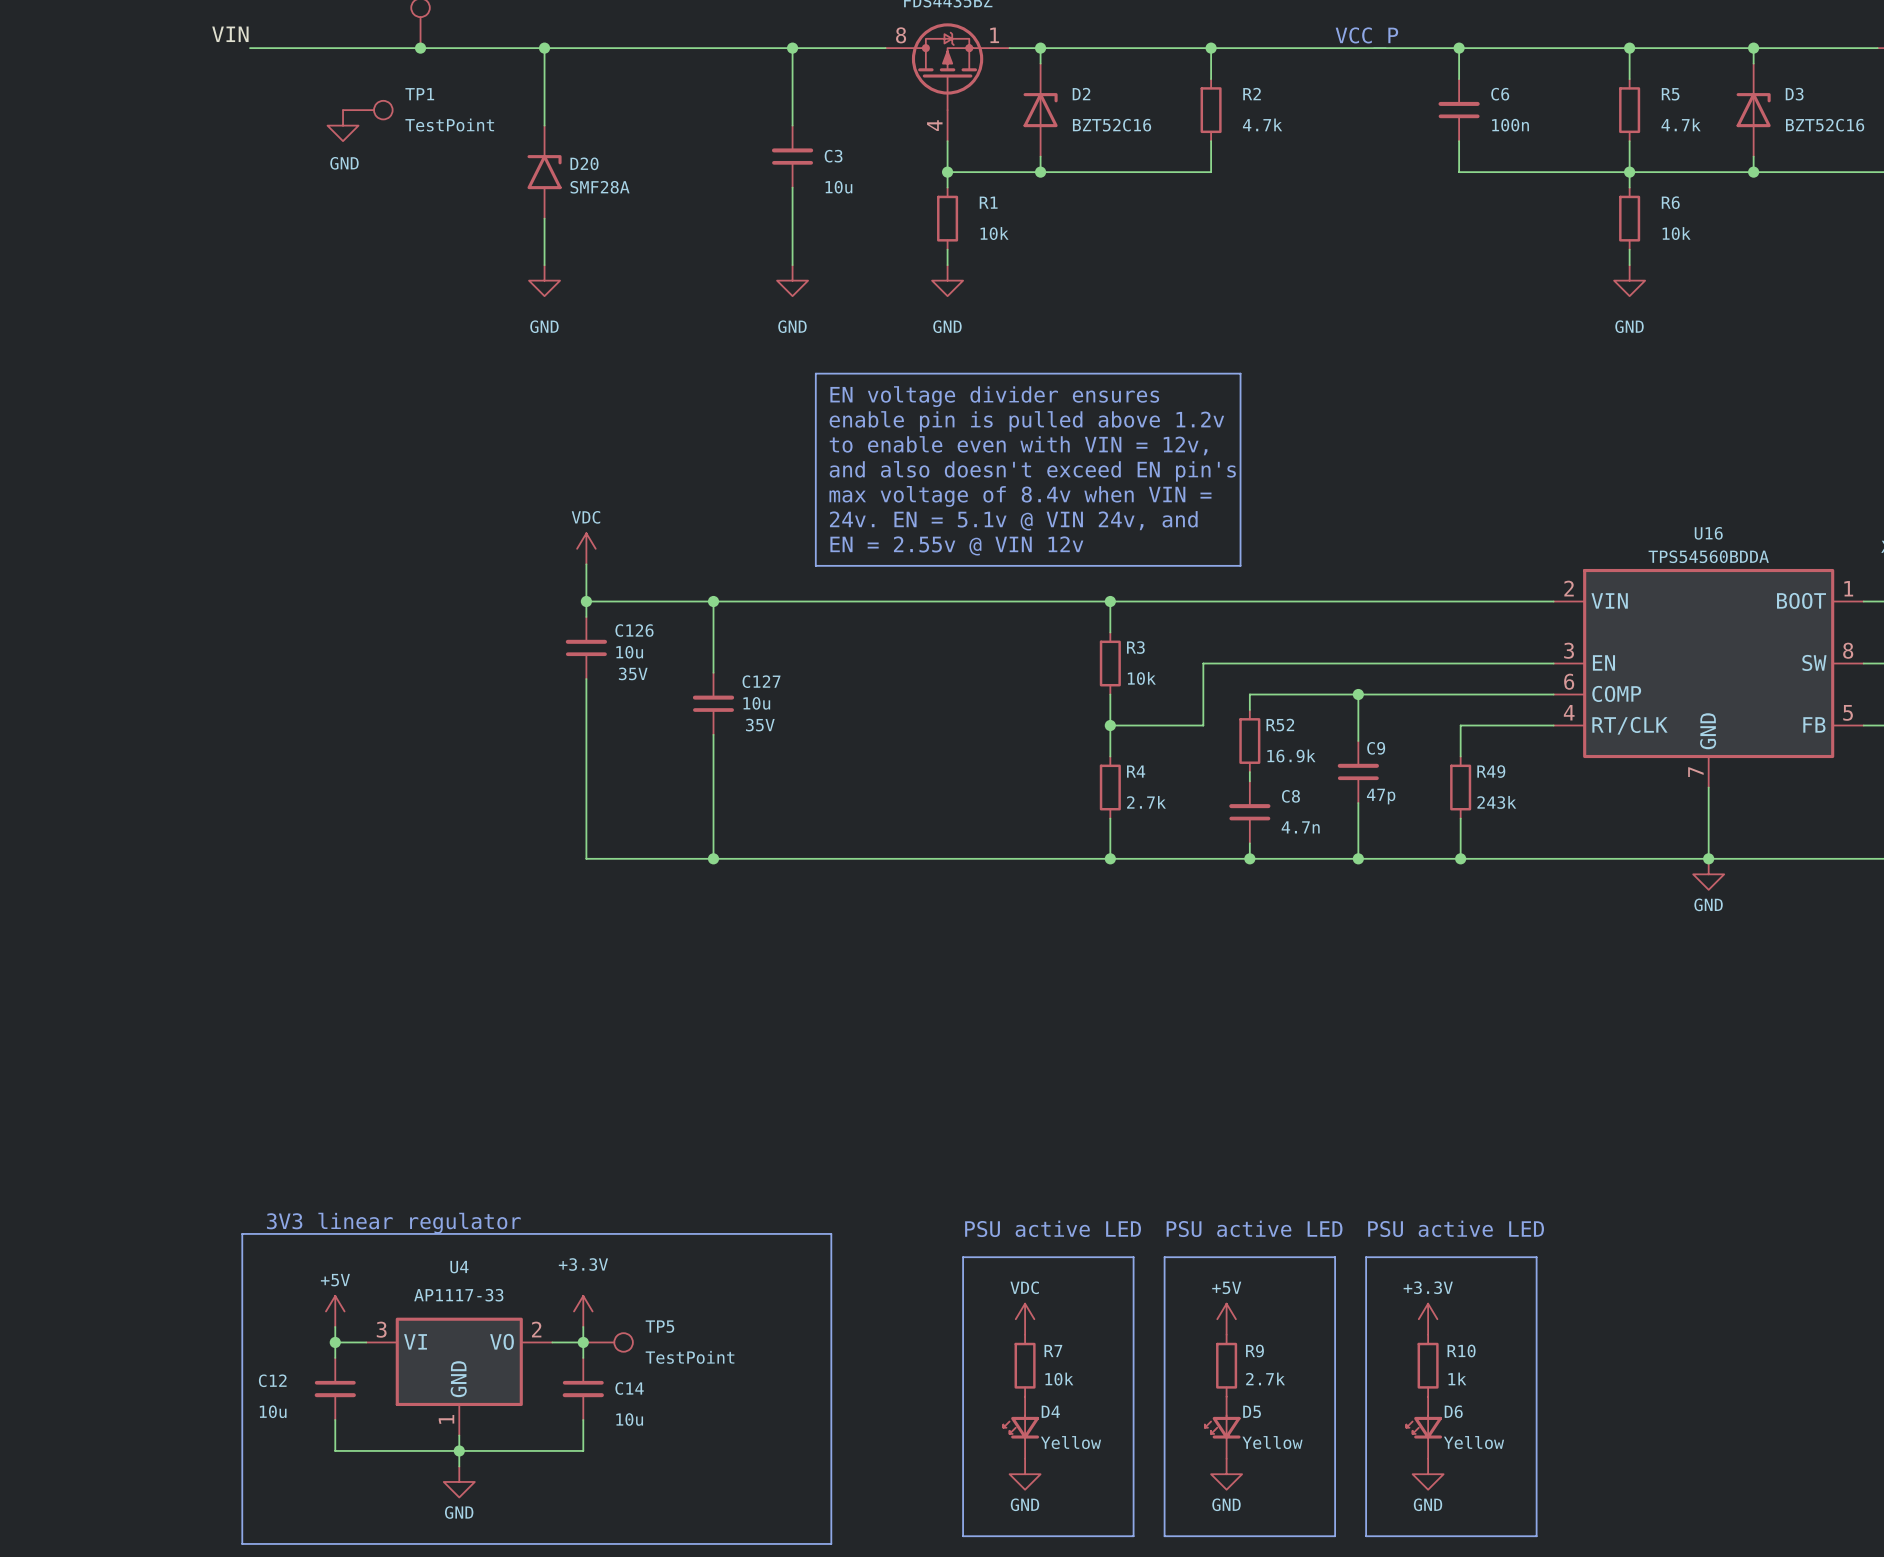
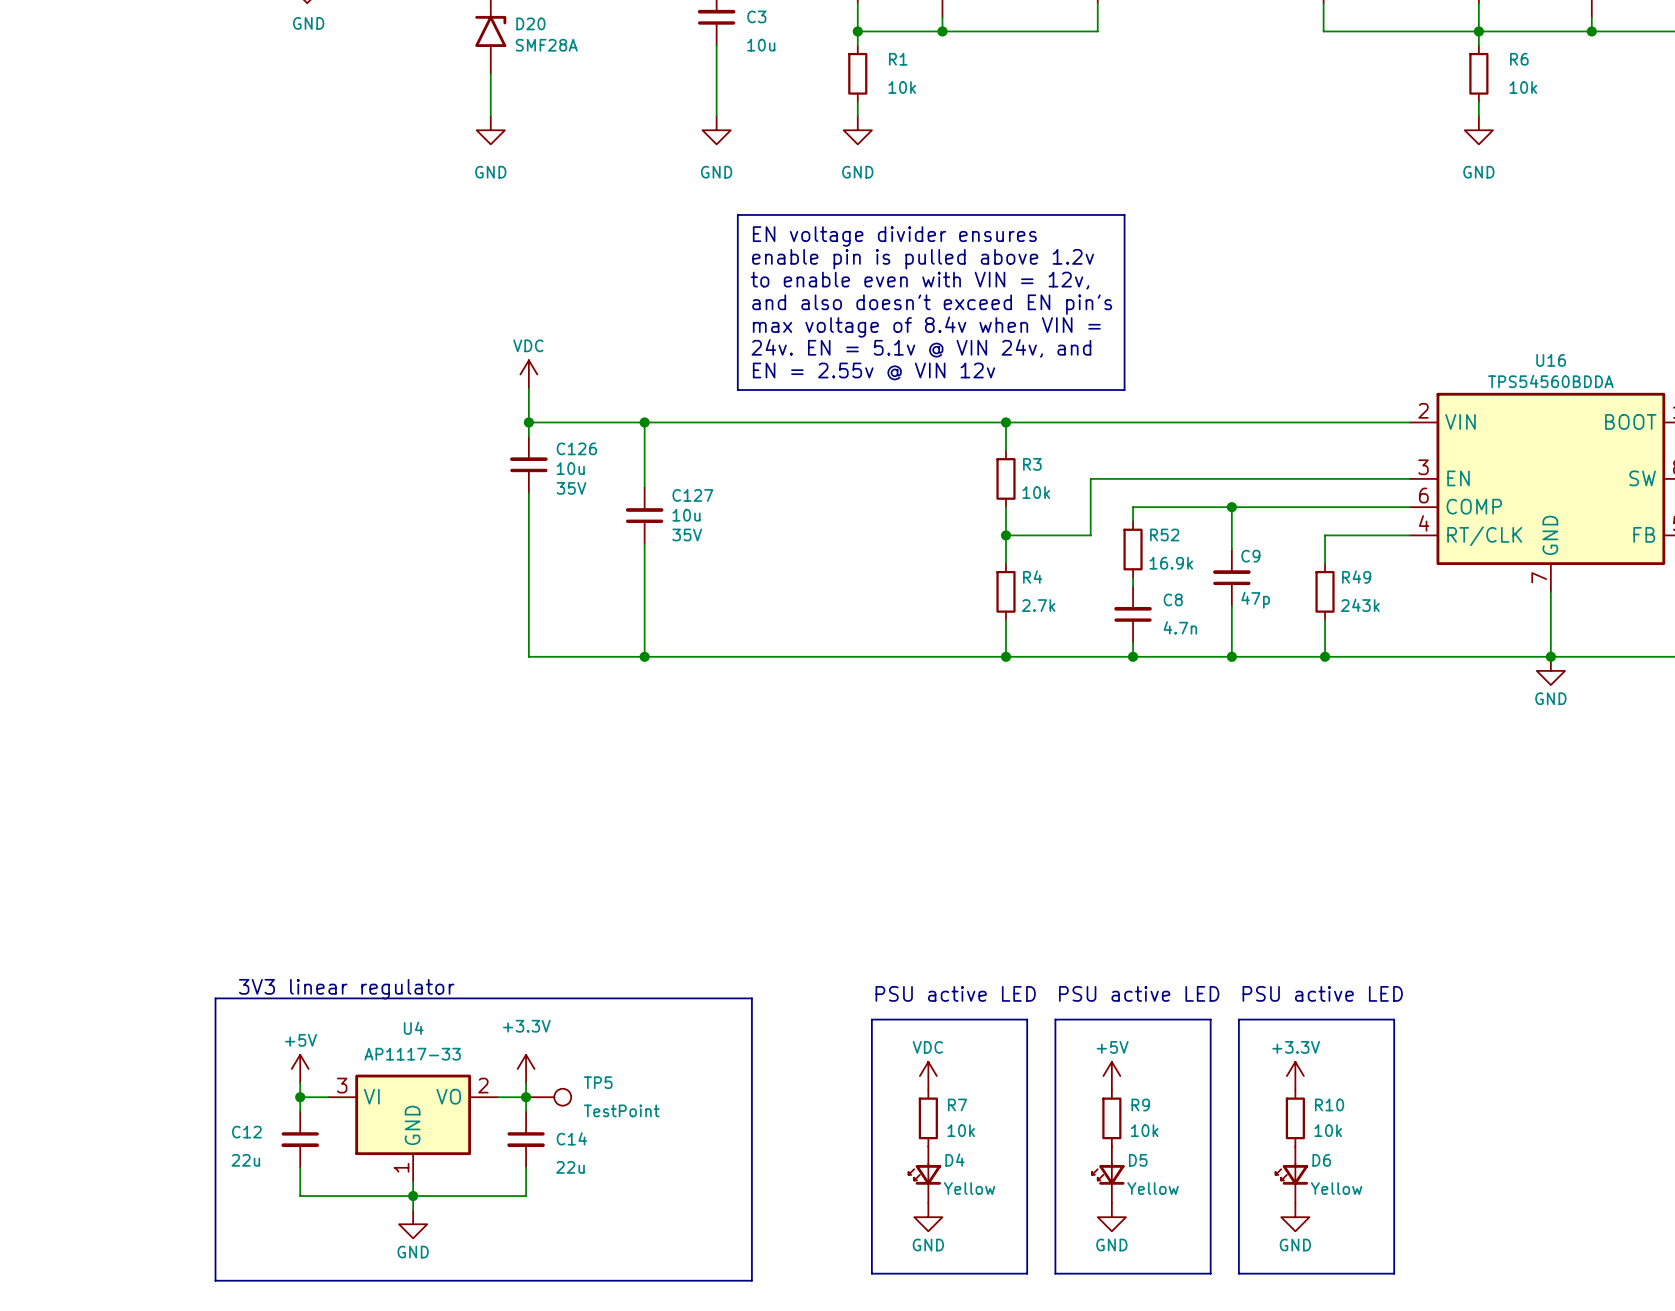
R9 value: 2.7k (1265, 1378) -> 10k (1144, 1130)
R10 value: 1k (1457, 1378) -> 10k (1328, 1130)
C12 value: 10u (273, 1411) -> 22u (245, 1160)
C14 value: 10u (629, 1419) -> 22u (570, 1167)

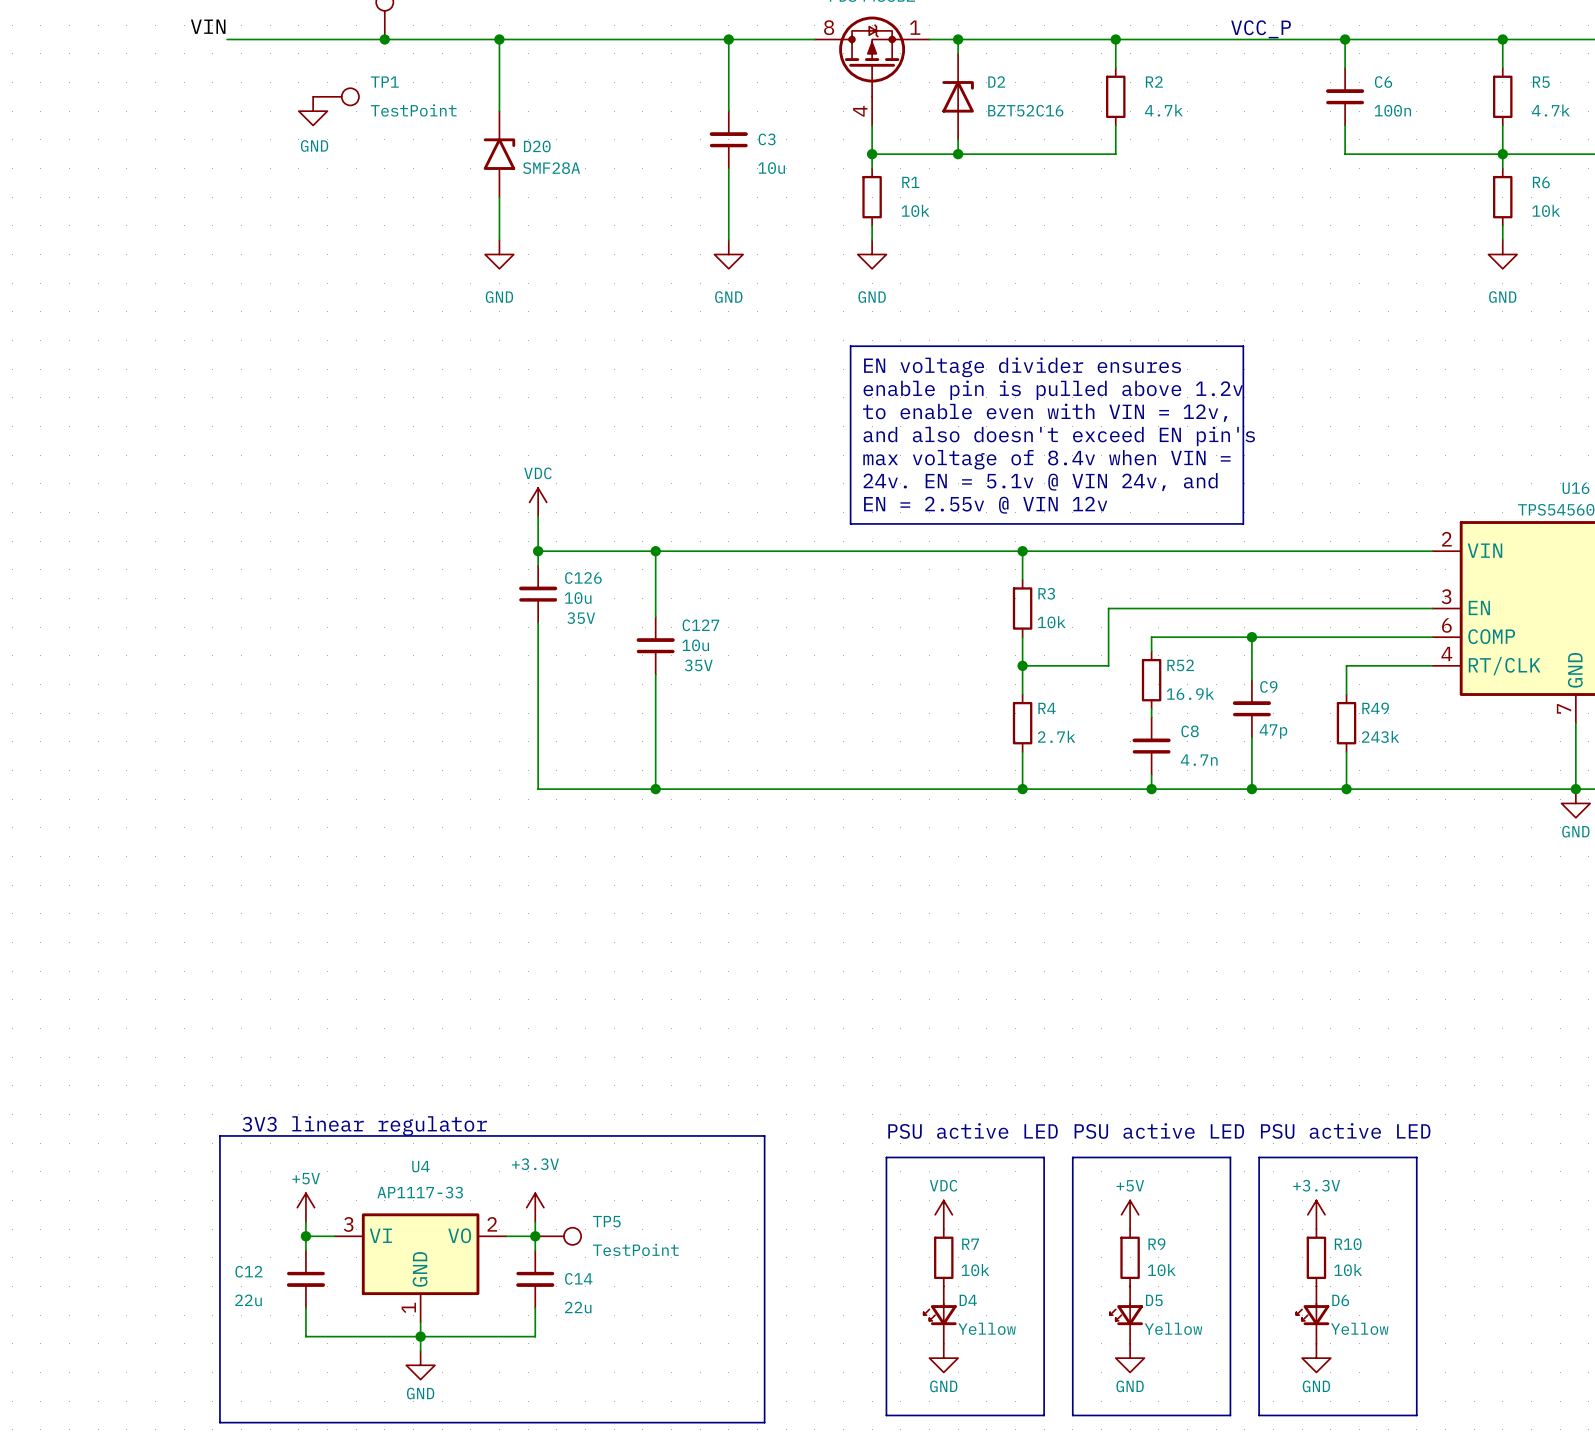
line: (737, 214) (1124, 214) (1124, 390) (737, 390) (737, 214) -> (850, 346) (850, 523) (1243, 523) (1243, 346) (850, 346)
text position: EN voltage divider ensures (894, 236) -> EN voltage divider ensures (1022, 367)
text position: enable pin is pulled above 1.2v (923, 259) -> enable pin is pulled above 1.2v (1053, 390)
text position: to enable even with VIN = 12v, (920, 280) -> to enable even with VIN = 12v, (1045, 412)
text position: and also doesn't exceed EN pin's (932, 304) -> and also doesn't exceed EN pin's (1059, 436)
text position: max voltage of 8.4v when VIN = (926, 327) -> max voltage of 8.4v when VIN = (1046, 459)
text position: 24v. EN = 5.1v @ VIN 24v, and (921, 348) -> 24v. EN = 5.1v @ VIN 24v, and (1040, 482)
text position: EN = 2.55v @ VIN 12v (874, 371) -> EN = 2.55v @ VIN 12v (985, 505)

